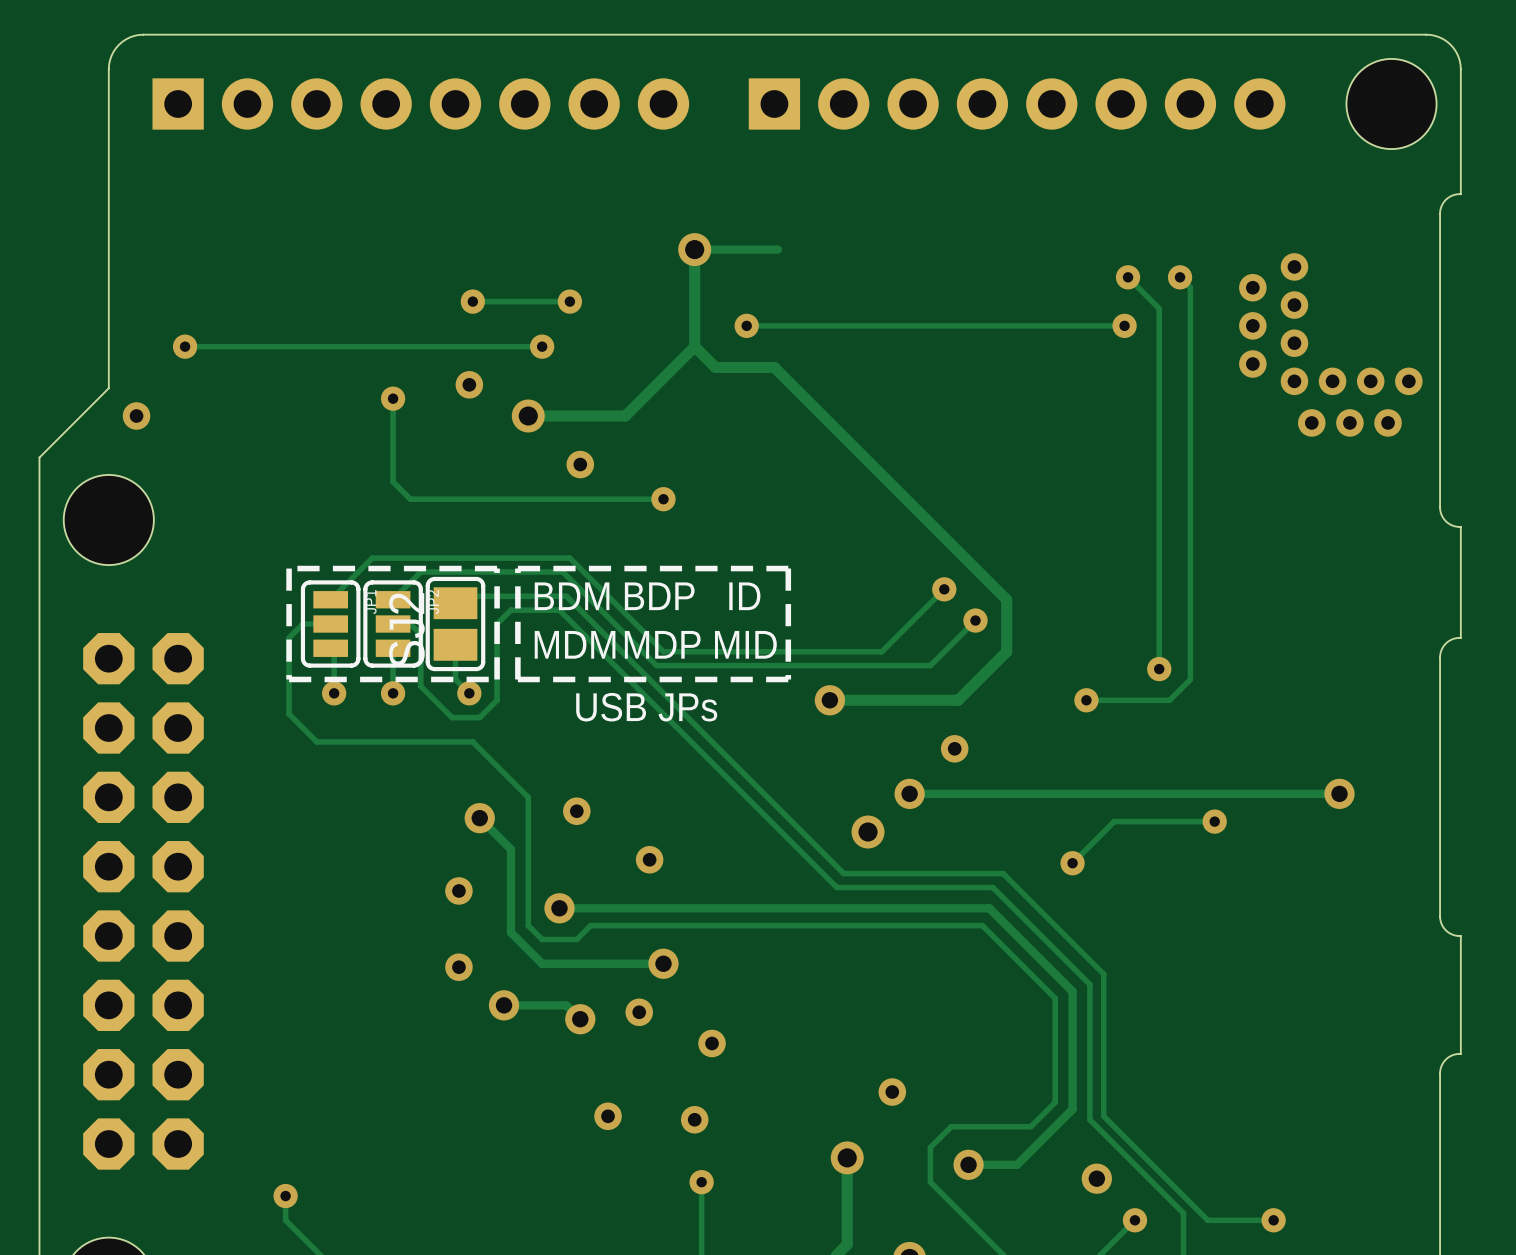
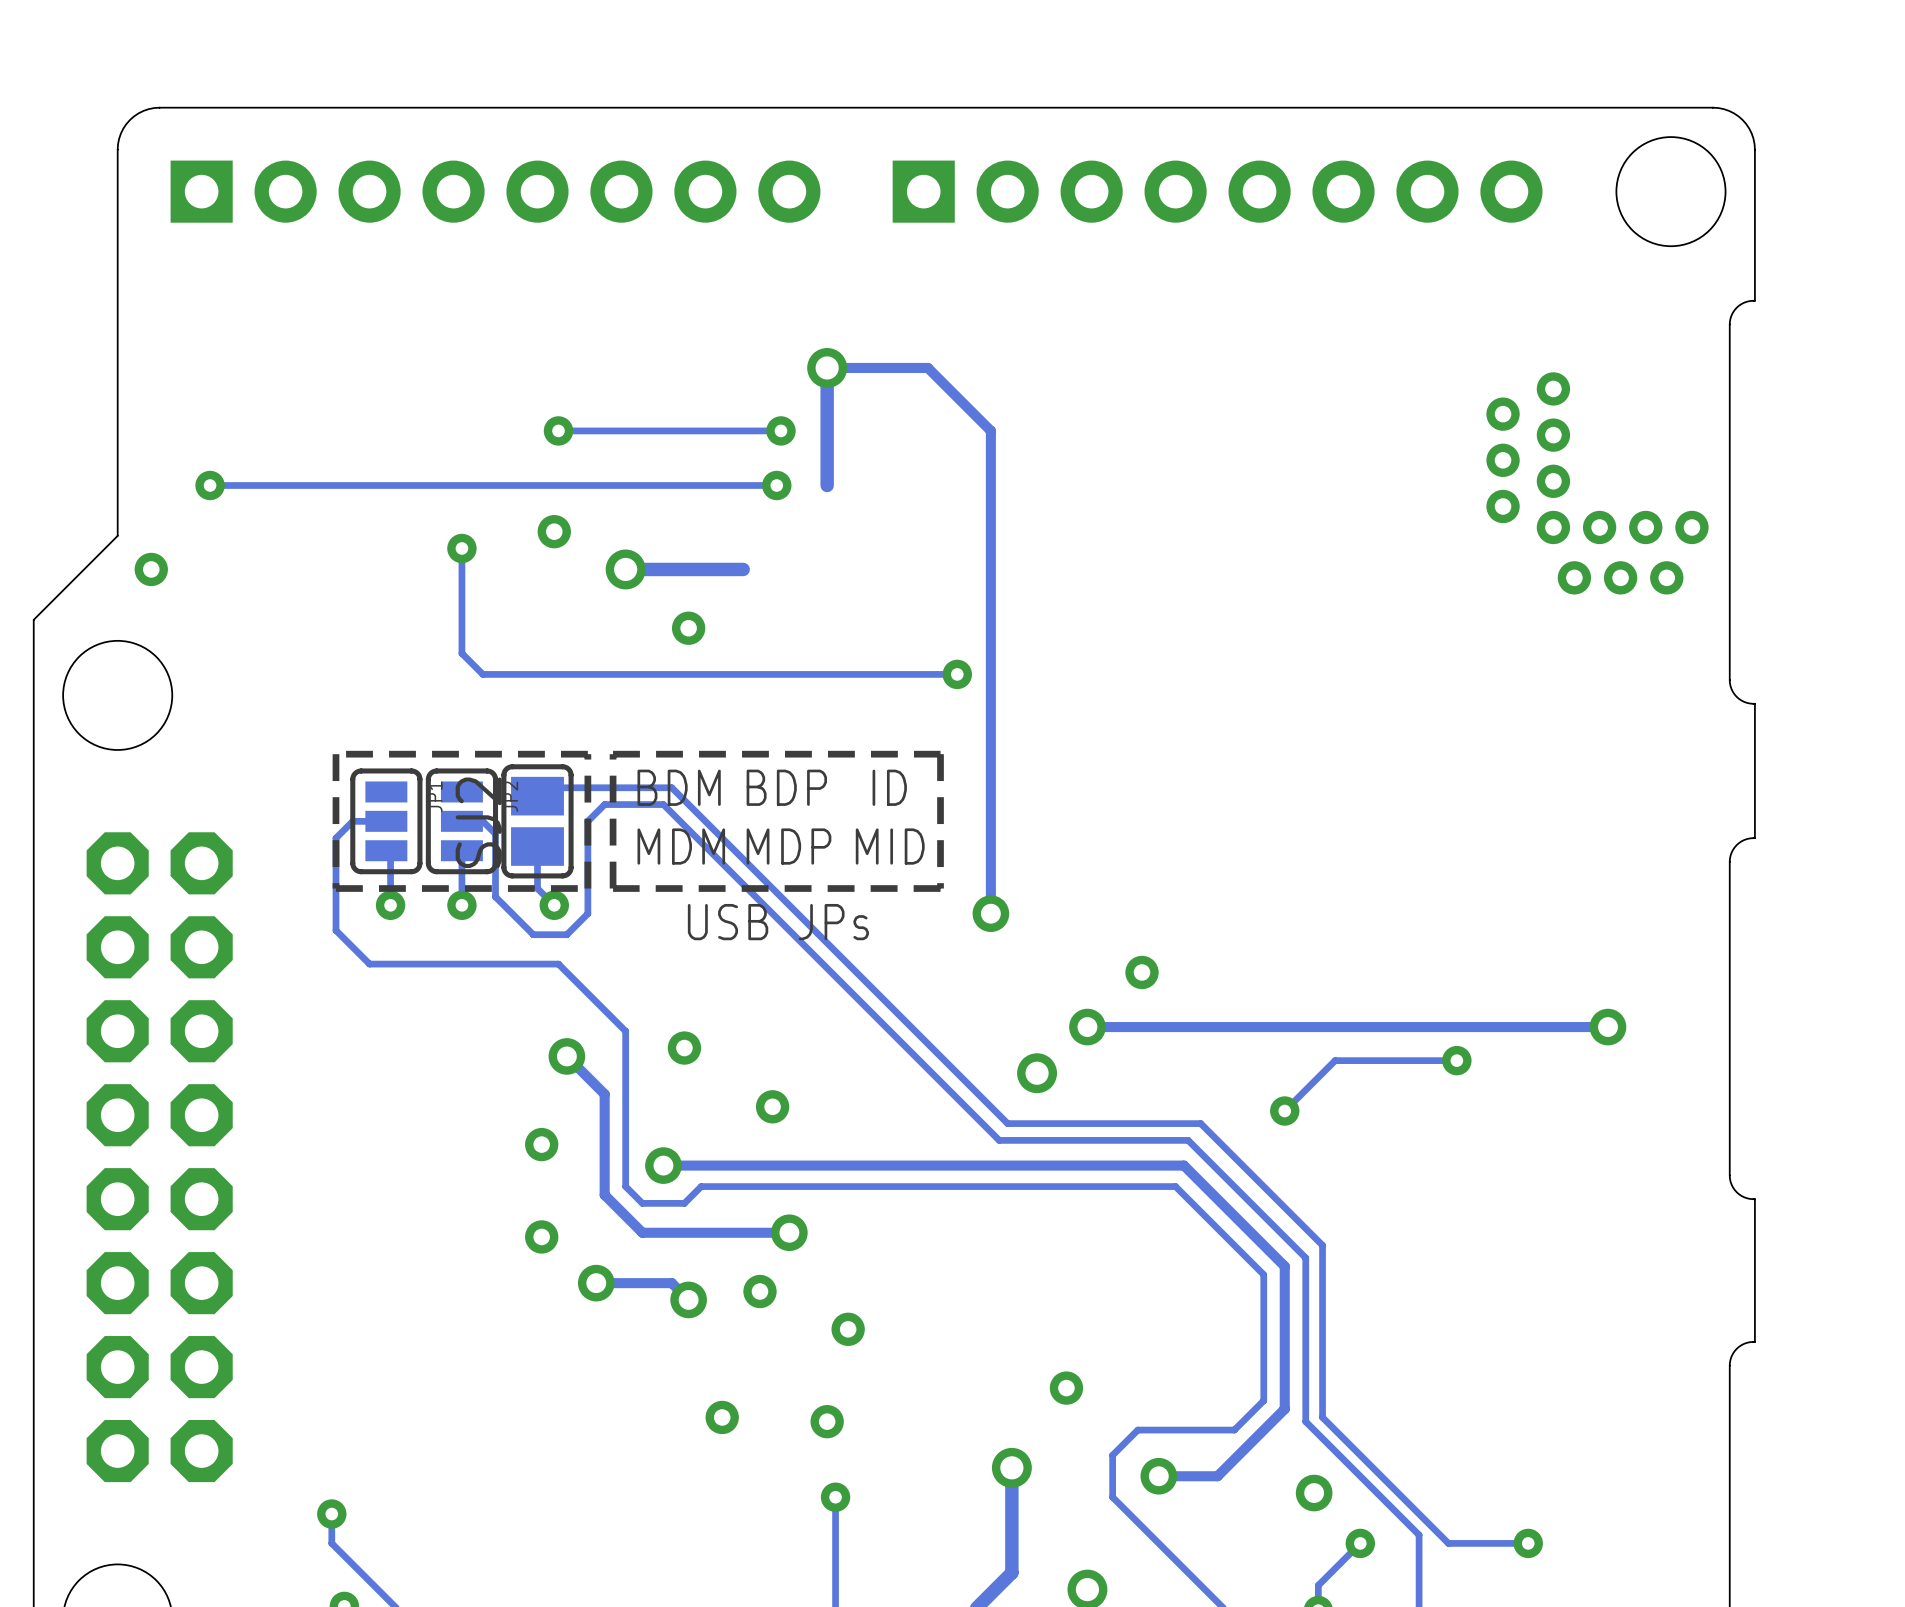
track: (1128, 277) (1159, 308) (1159, 669) -> none
via: (1128, 277) -> none
track: (1180, 277) (1190, 287) (1190, 679) (1169, 700) (1086, 700) -> none
via: (1180, 277) -> none
via: (569, 301) -> none
track: none -> (780, 430) (676, 430)
via: none -> (780, 430)
via: (746, 325) -> none
track: (1124, 325) (746, 325) -> none
via: (1124, 325) -> none
via: (542, 346) -> none
track: none -> (776, 485) (642, 485)
via: none -> (776, 485)
track: (625, 416) (694, 346) (715, 367) (774, 367) (1006, 599) (1006, 651) (958, 700) (829, 700) -> (927, 367) (990, 430) (990, 913)
track: (393, 481) (410, 499) (663, 499) -> (461, 649) (461, 653) (482, 674) (957, 674)
via: (663, 499) -> none
via: none -> (957, 674)
track: (944, 589) (881, 651) (663, 651) (569, 558) (372, 558) (330, 599) -> none
via: (944, 589) -> none
track: (393, 599) (420, 572) (562, 572) (656, 665) (930, 665) (975, 620) -> none
via: (975, 620) -> none
via: (1159, 669) -> none
via: (1086, 700) -> none

